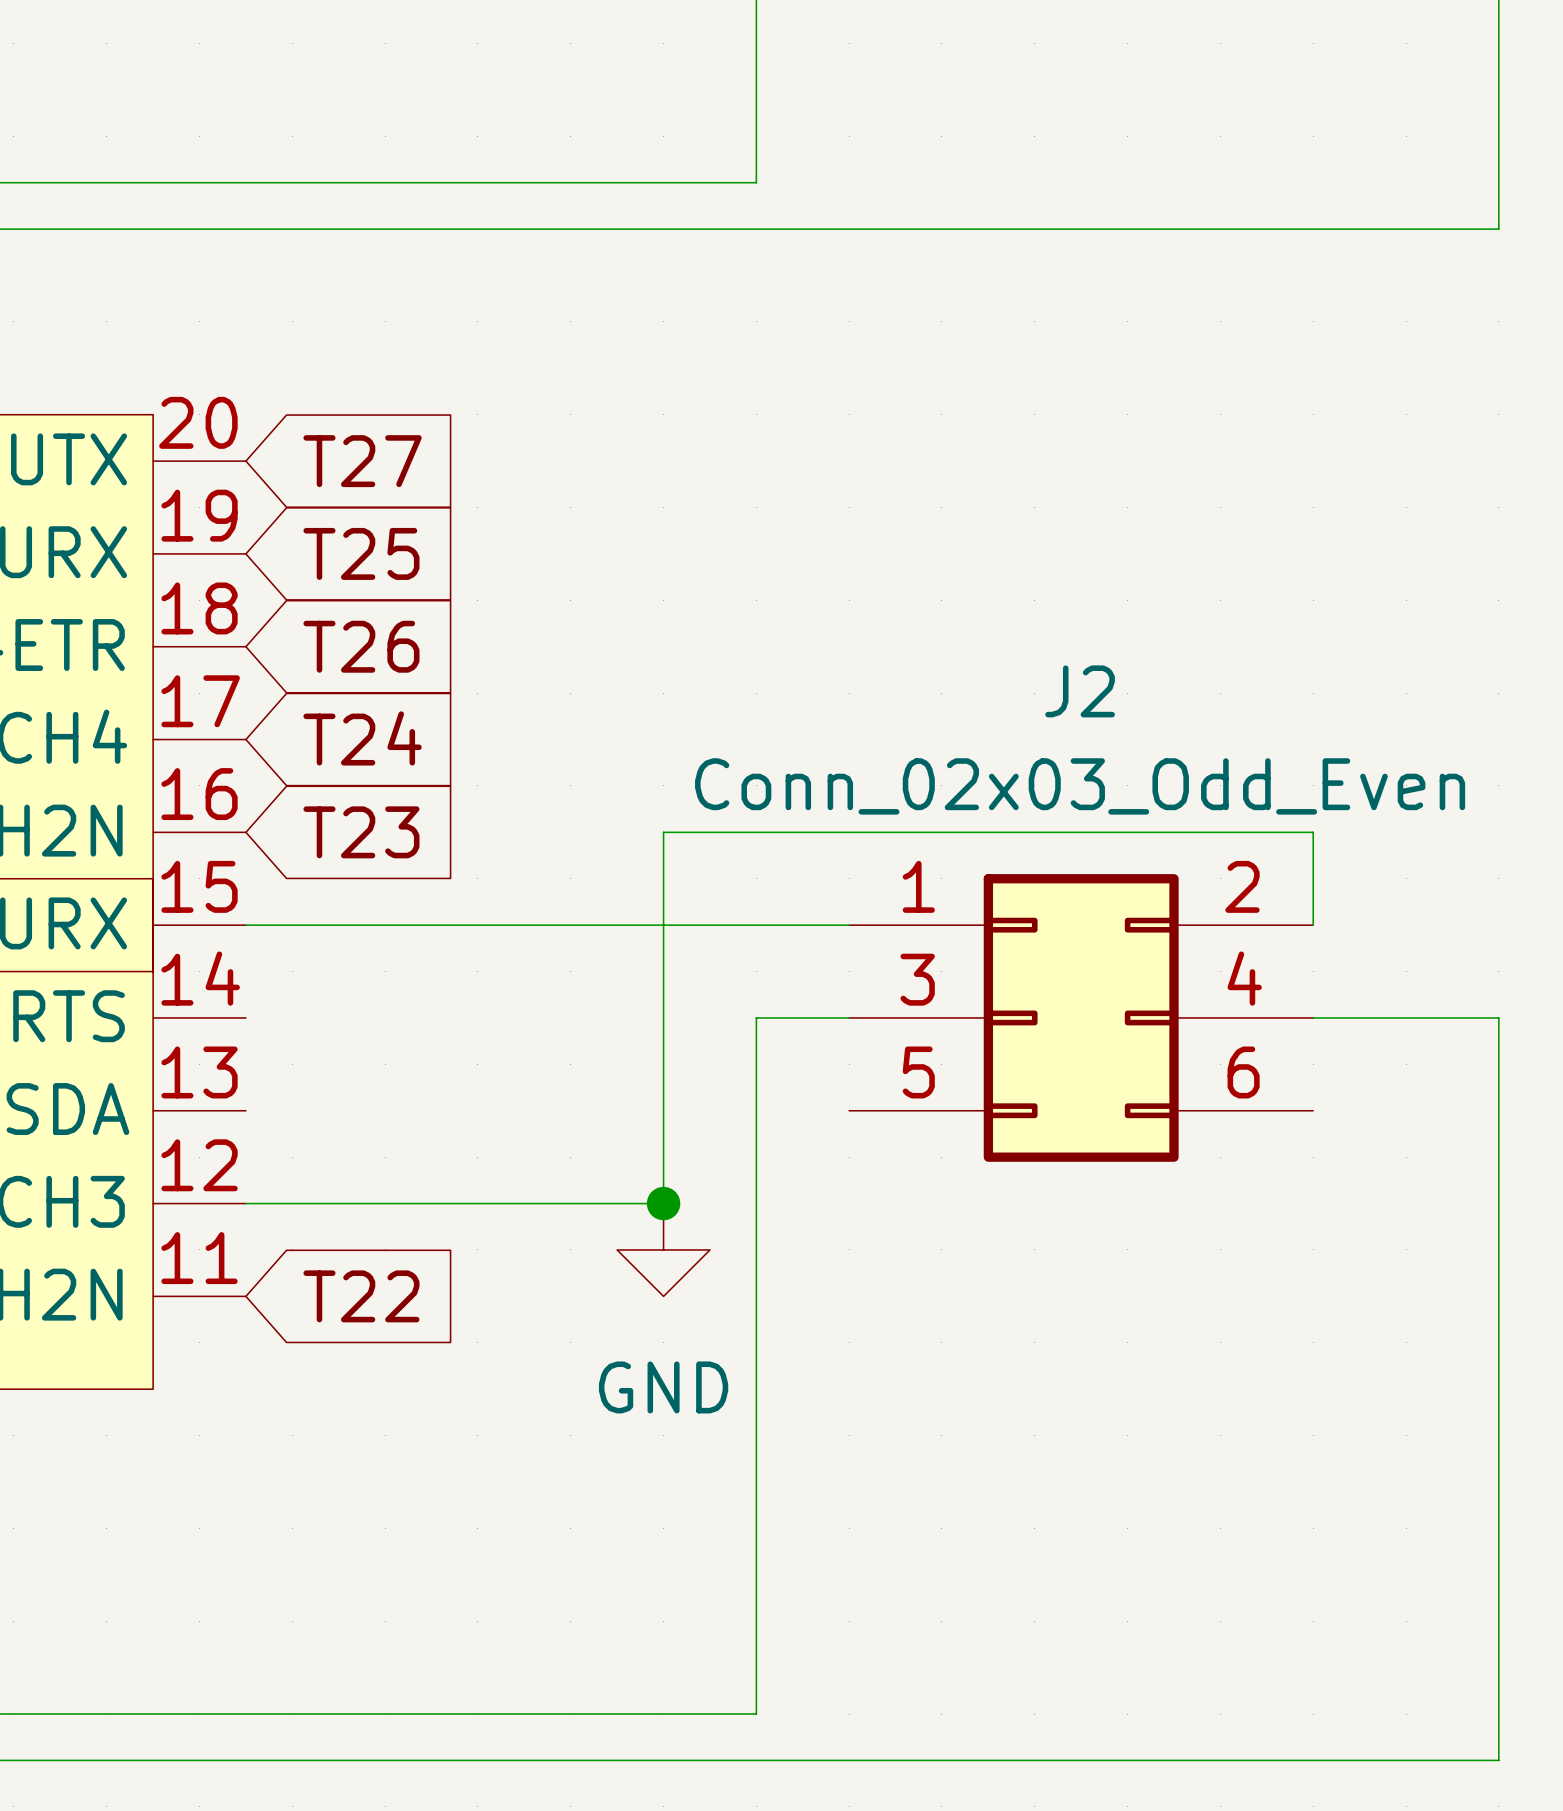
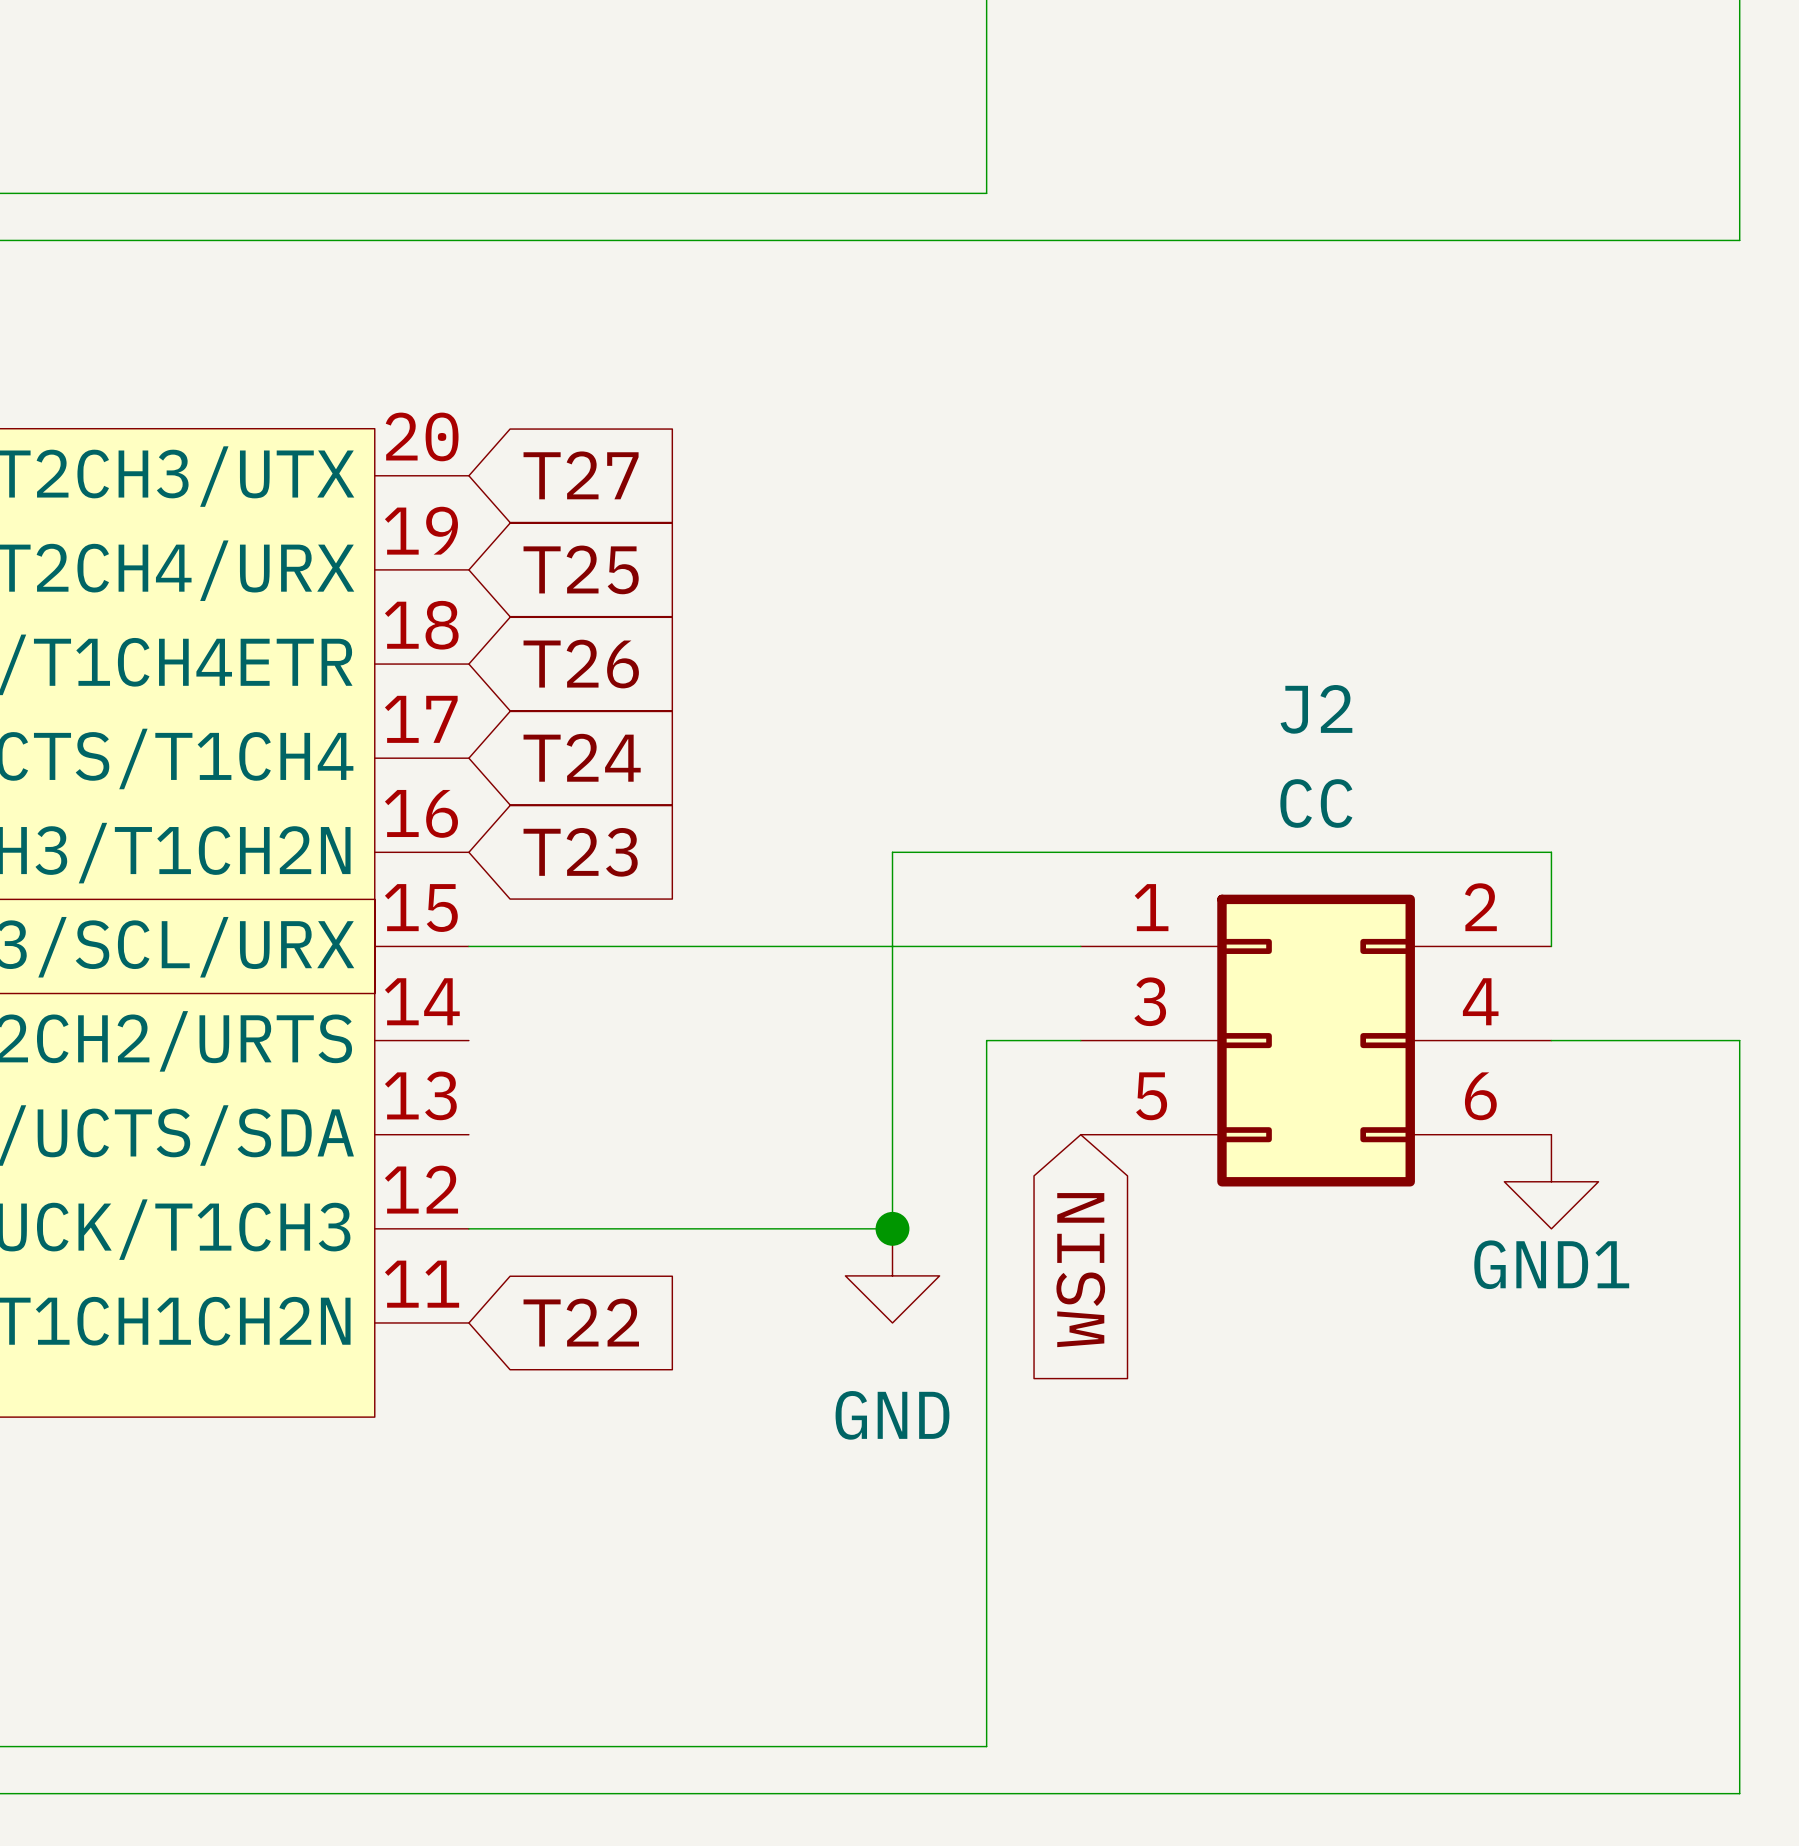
J2 value: Conn_02x03_Odd_Even (1080, 786) -> CC (1316, 803)
power symbol: none -> GND1 (1551, 1181)
global label: none -> WSIN (1080, 1270)

